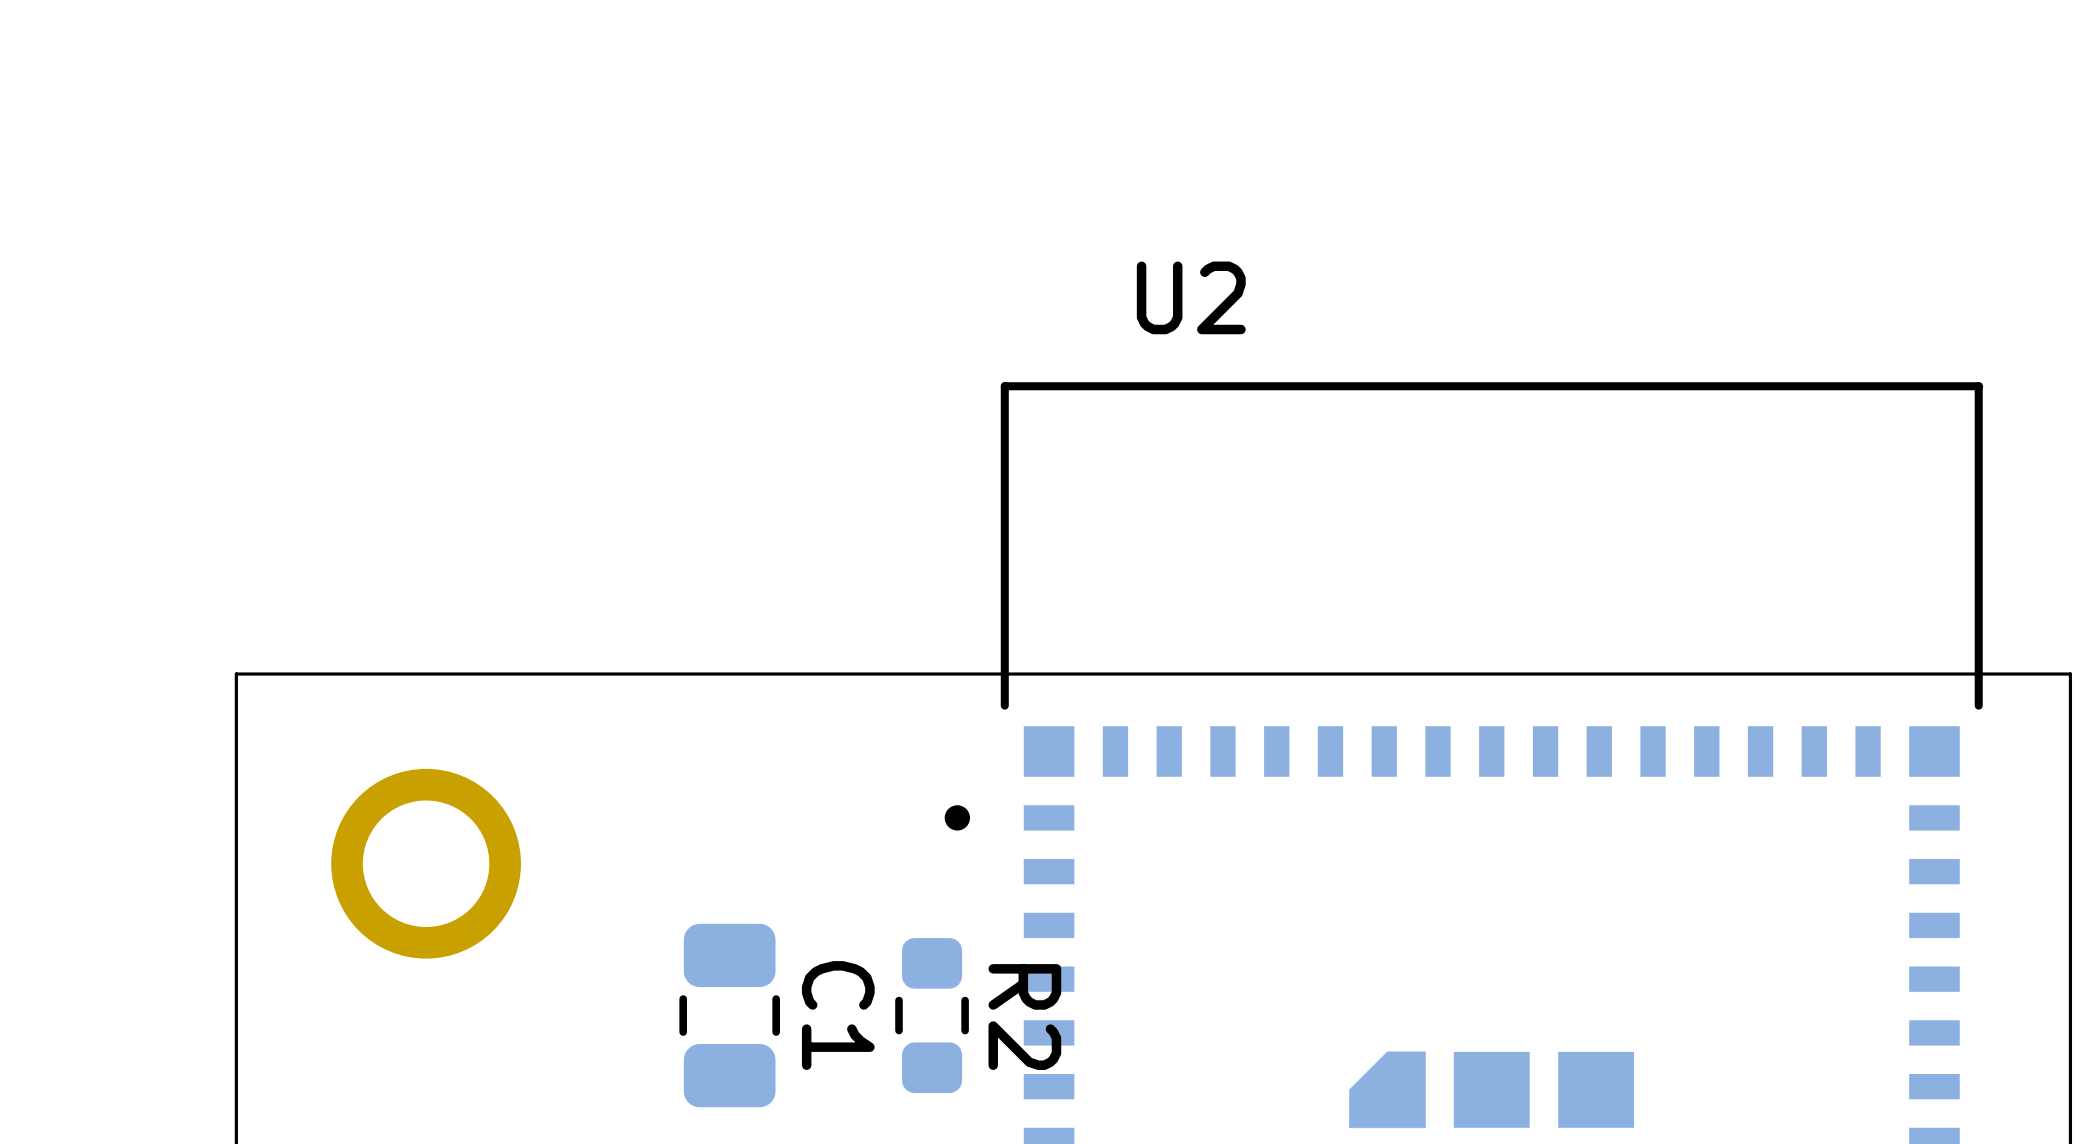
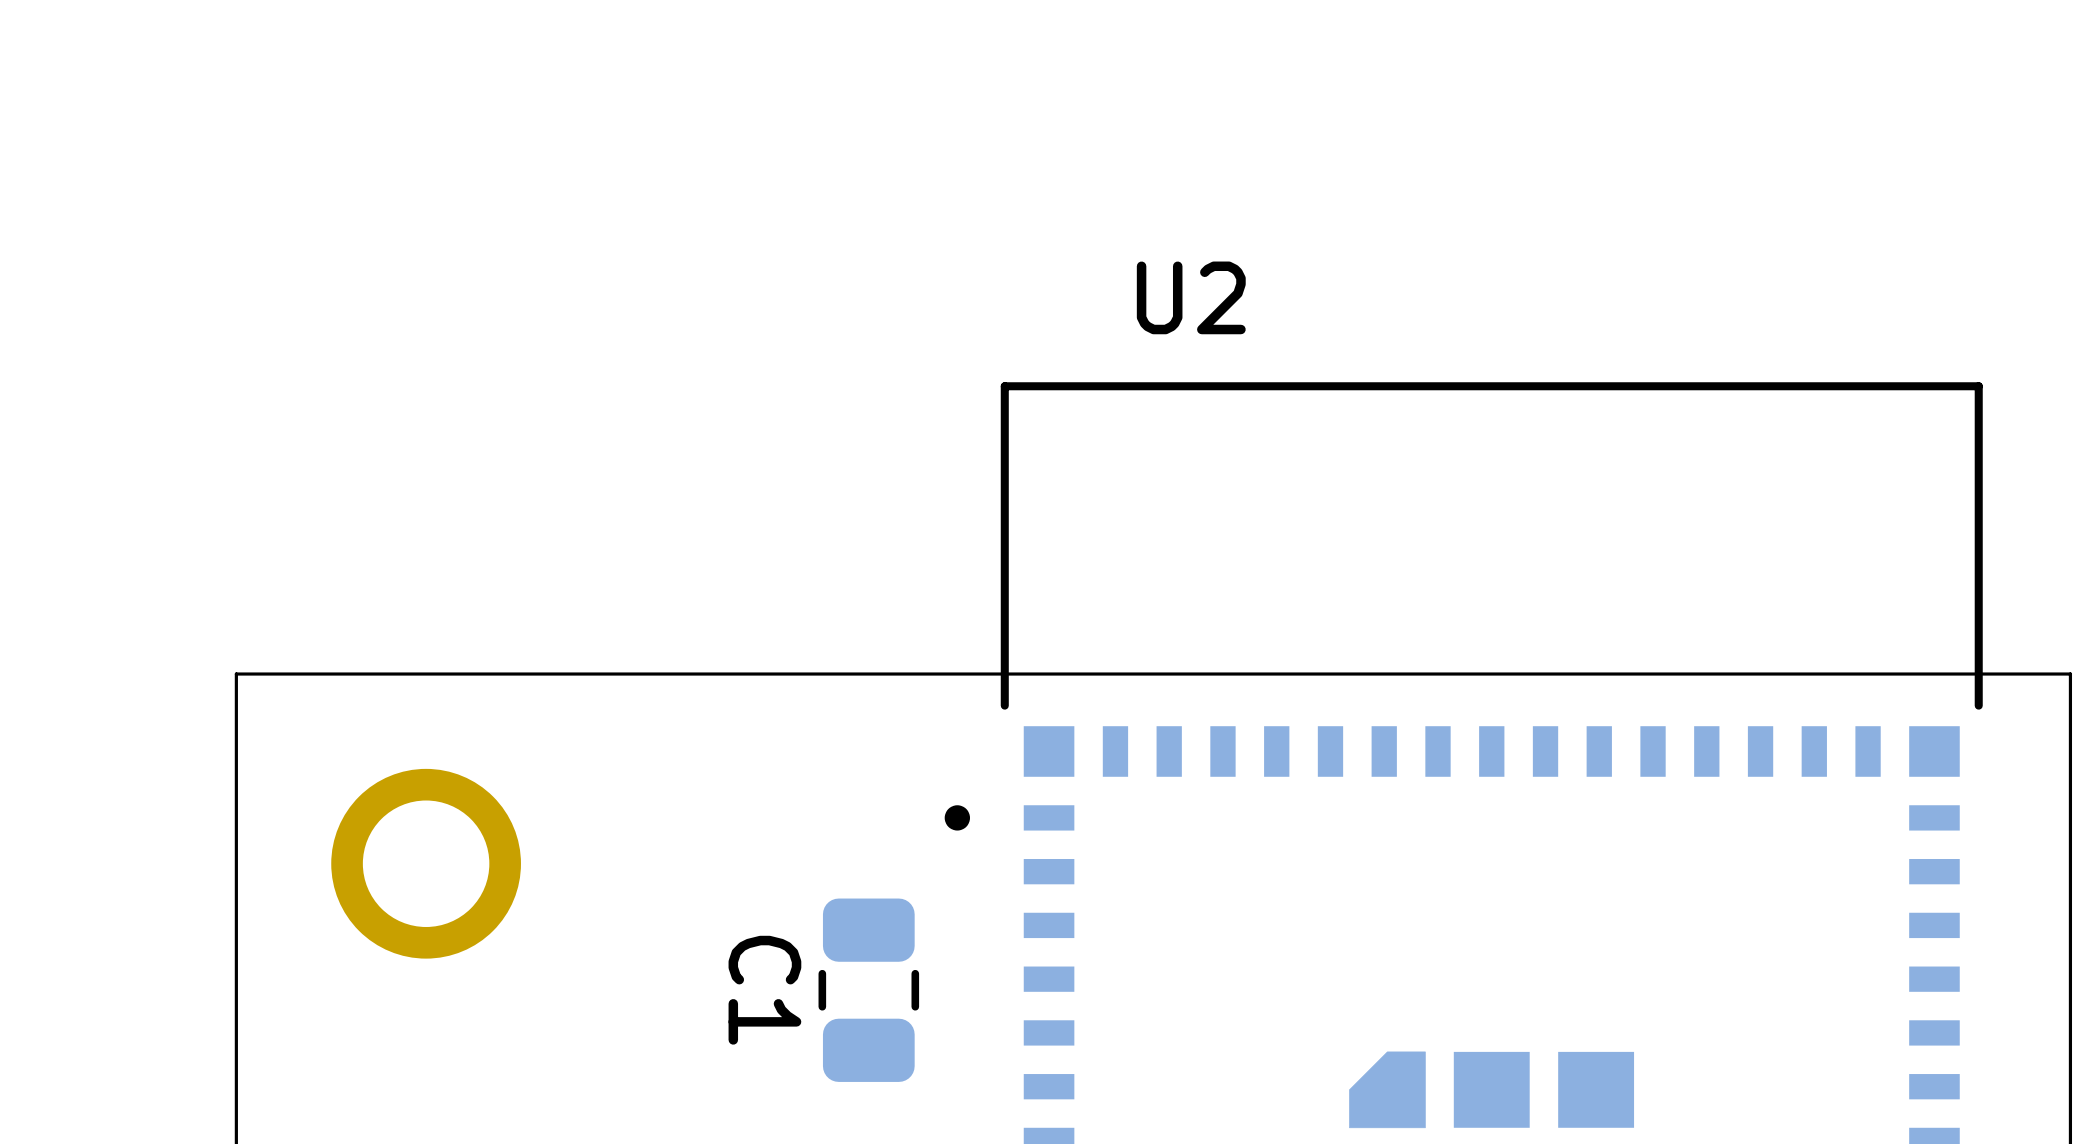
C1 position: (729, 1015) -> (868, 990)
C1 name position: C1 (838, 1015) -> C1 (764, 990)
R2: (932, 1015) -> none

